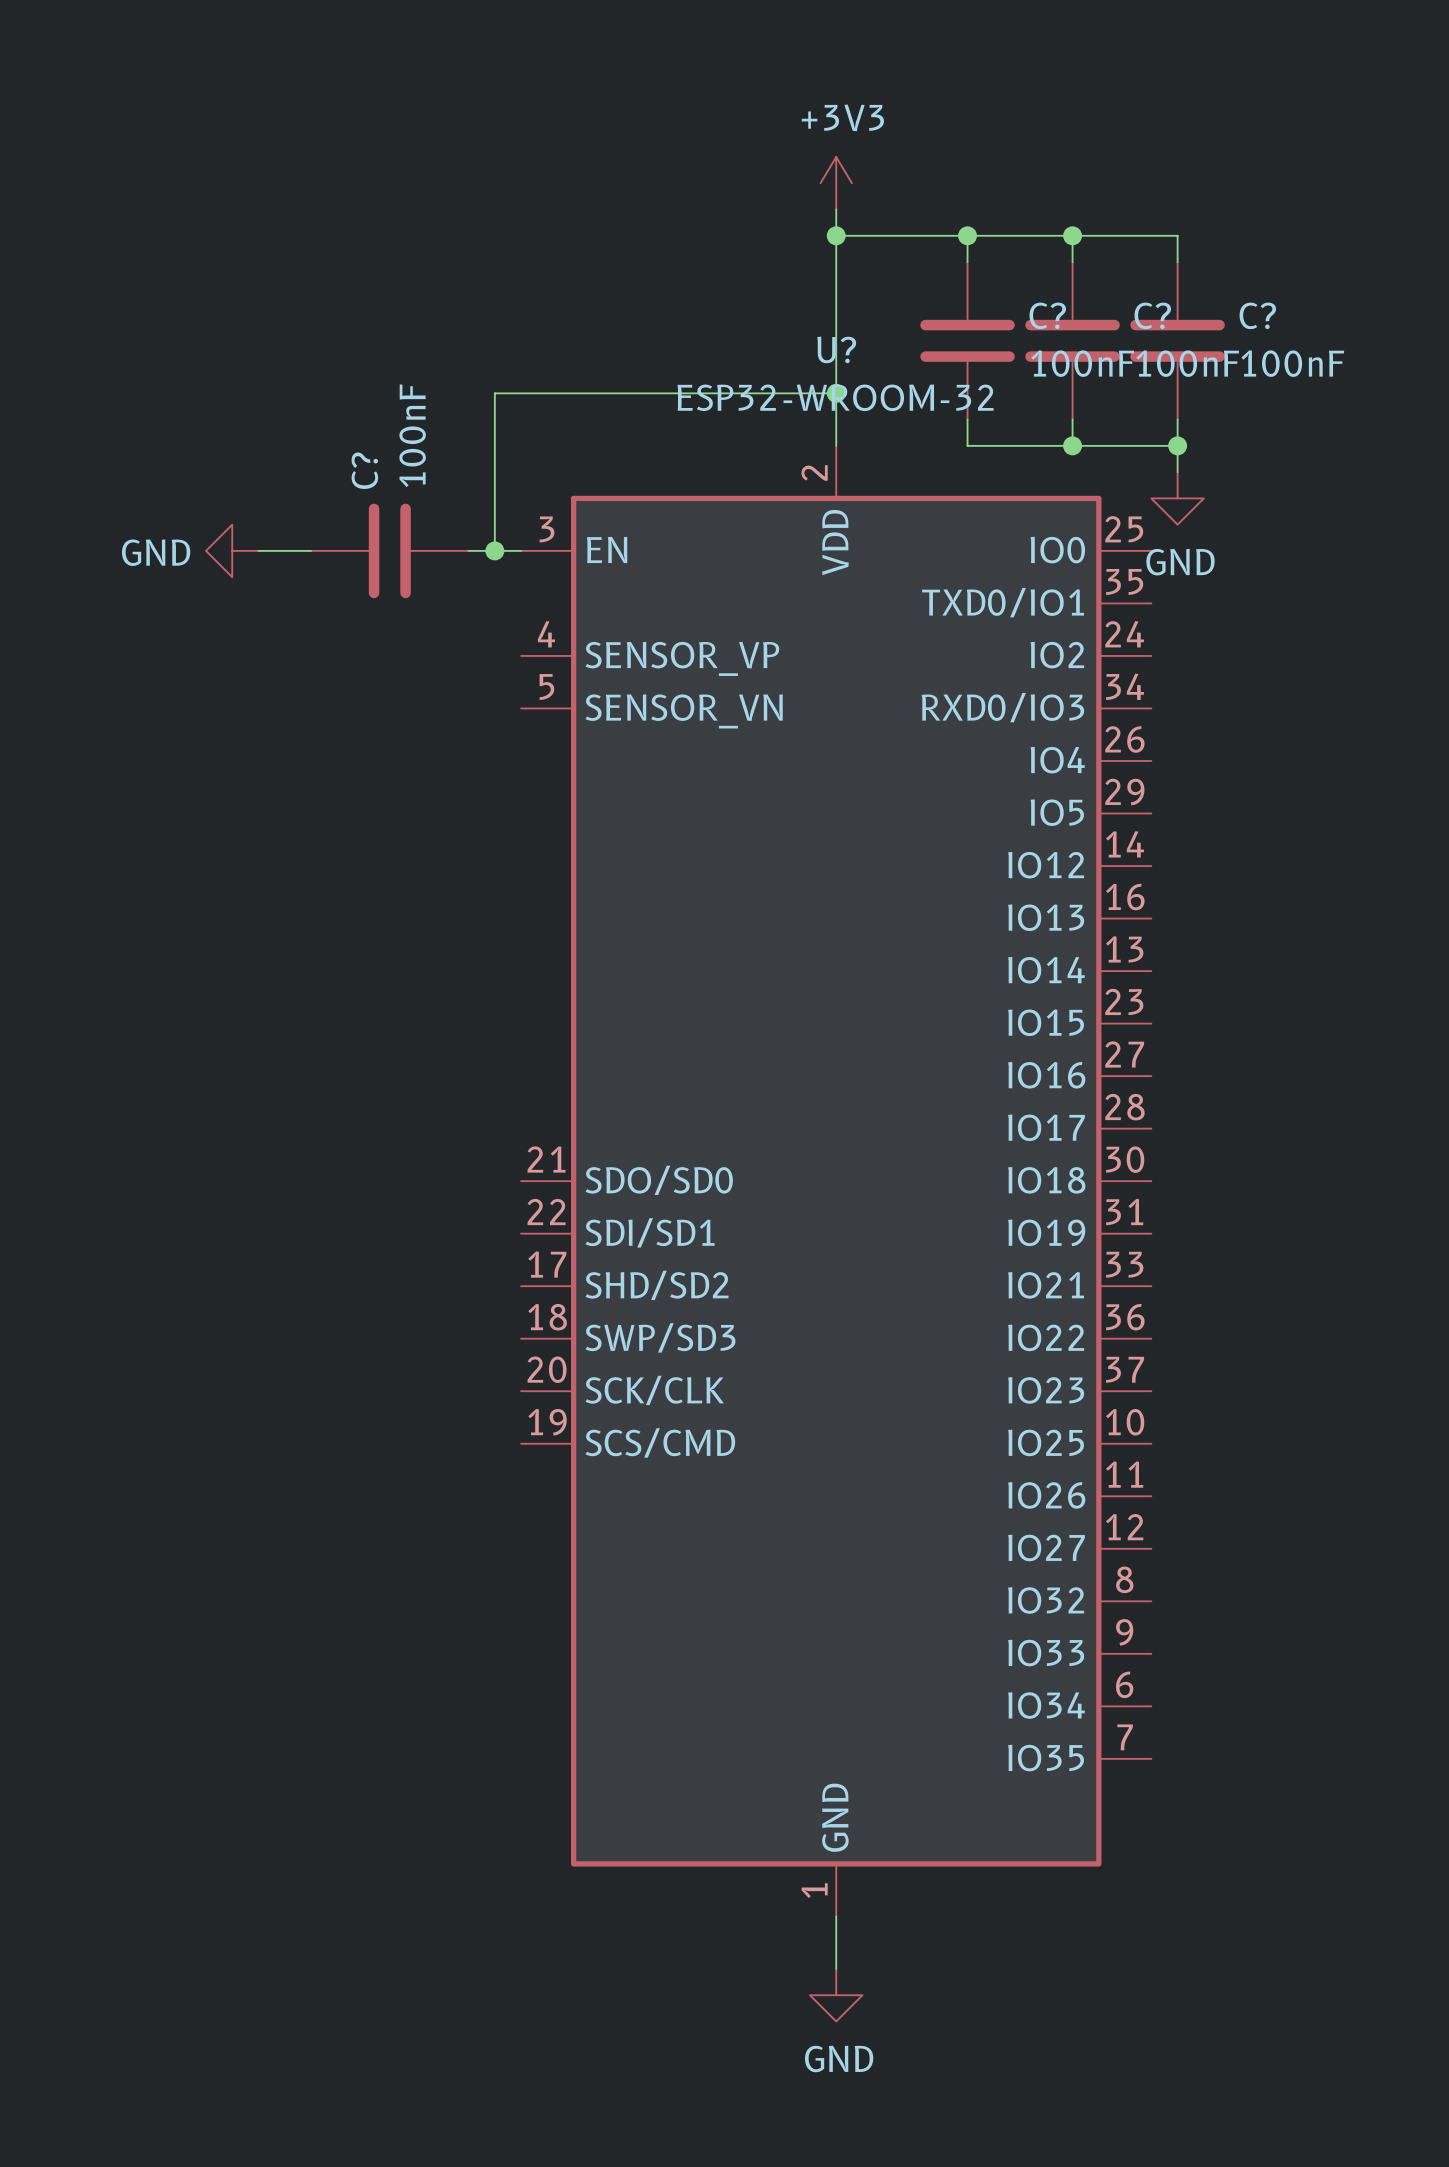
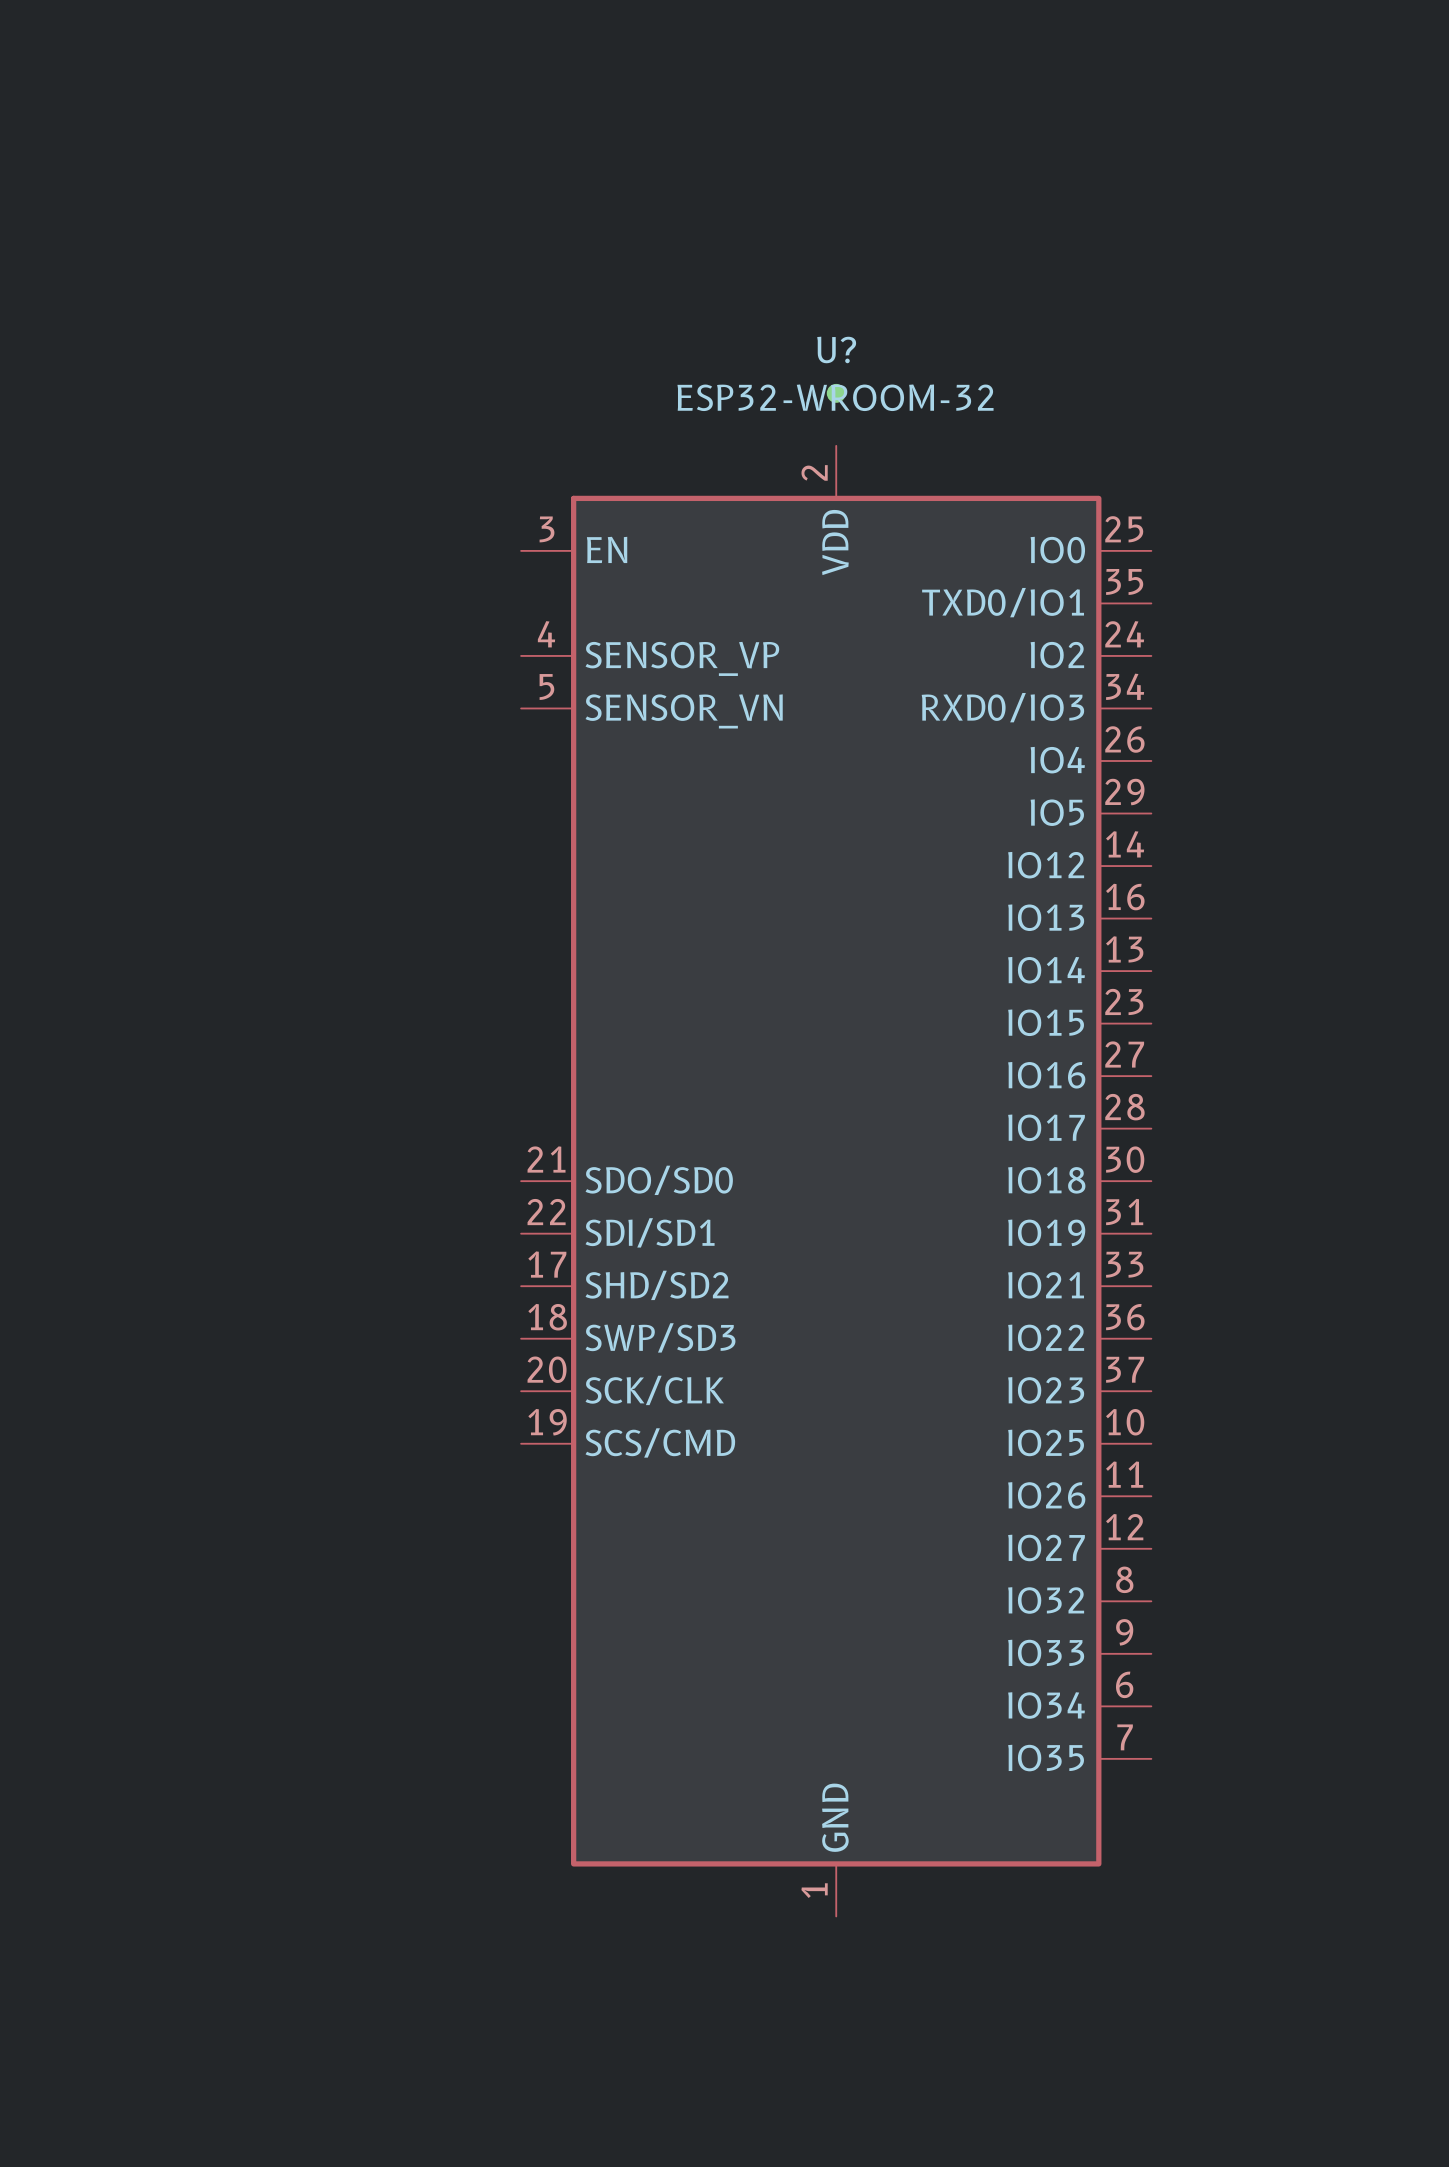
power symbol: +3V3 (836, 183) -> none
wire: (836, 209) (836, 445) -> none
wire: (836, 235) (1177, 235) (1177, 262) -> none
junction: (836, 235) -> none
wire: (967, 235) (967, 262) -> none
junction: (967, 235) -> none
wire: (1072, 235) (1072, 262) -> none
junction: (1072, 235) -> none
C?: 100nF (967, 340) -> none
C?: 100nF (1072, 340) -> none
C?: 100nF (1177, 340) -> none
wire: (836, 393) (494, 393) (494, 550) -> none
wire: (967, 419) (967, 445) (1177, 445) -> none
wire: (1072, 419) (1072, 445) -> none
wire: (1177, 419) (1177, 472) -> none
junction: (1072, 445) -> none
junction: (1177, 445) -> none
power symbol: GND (1177, 498) -> none
power symbol: GND (232, 550) -> none
wire: (258, 550) (311, 550) -> none
C?: 100nF (389, 550) -> none
wire: (468, 550) (521, 550) -> none
junction: (494, 550) -> none
wire: (836, 1916) (836, 1968) -> none
power symbol: GND (836, 1995) -> none

